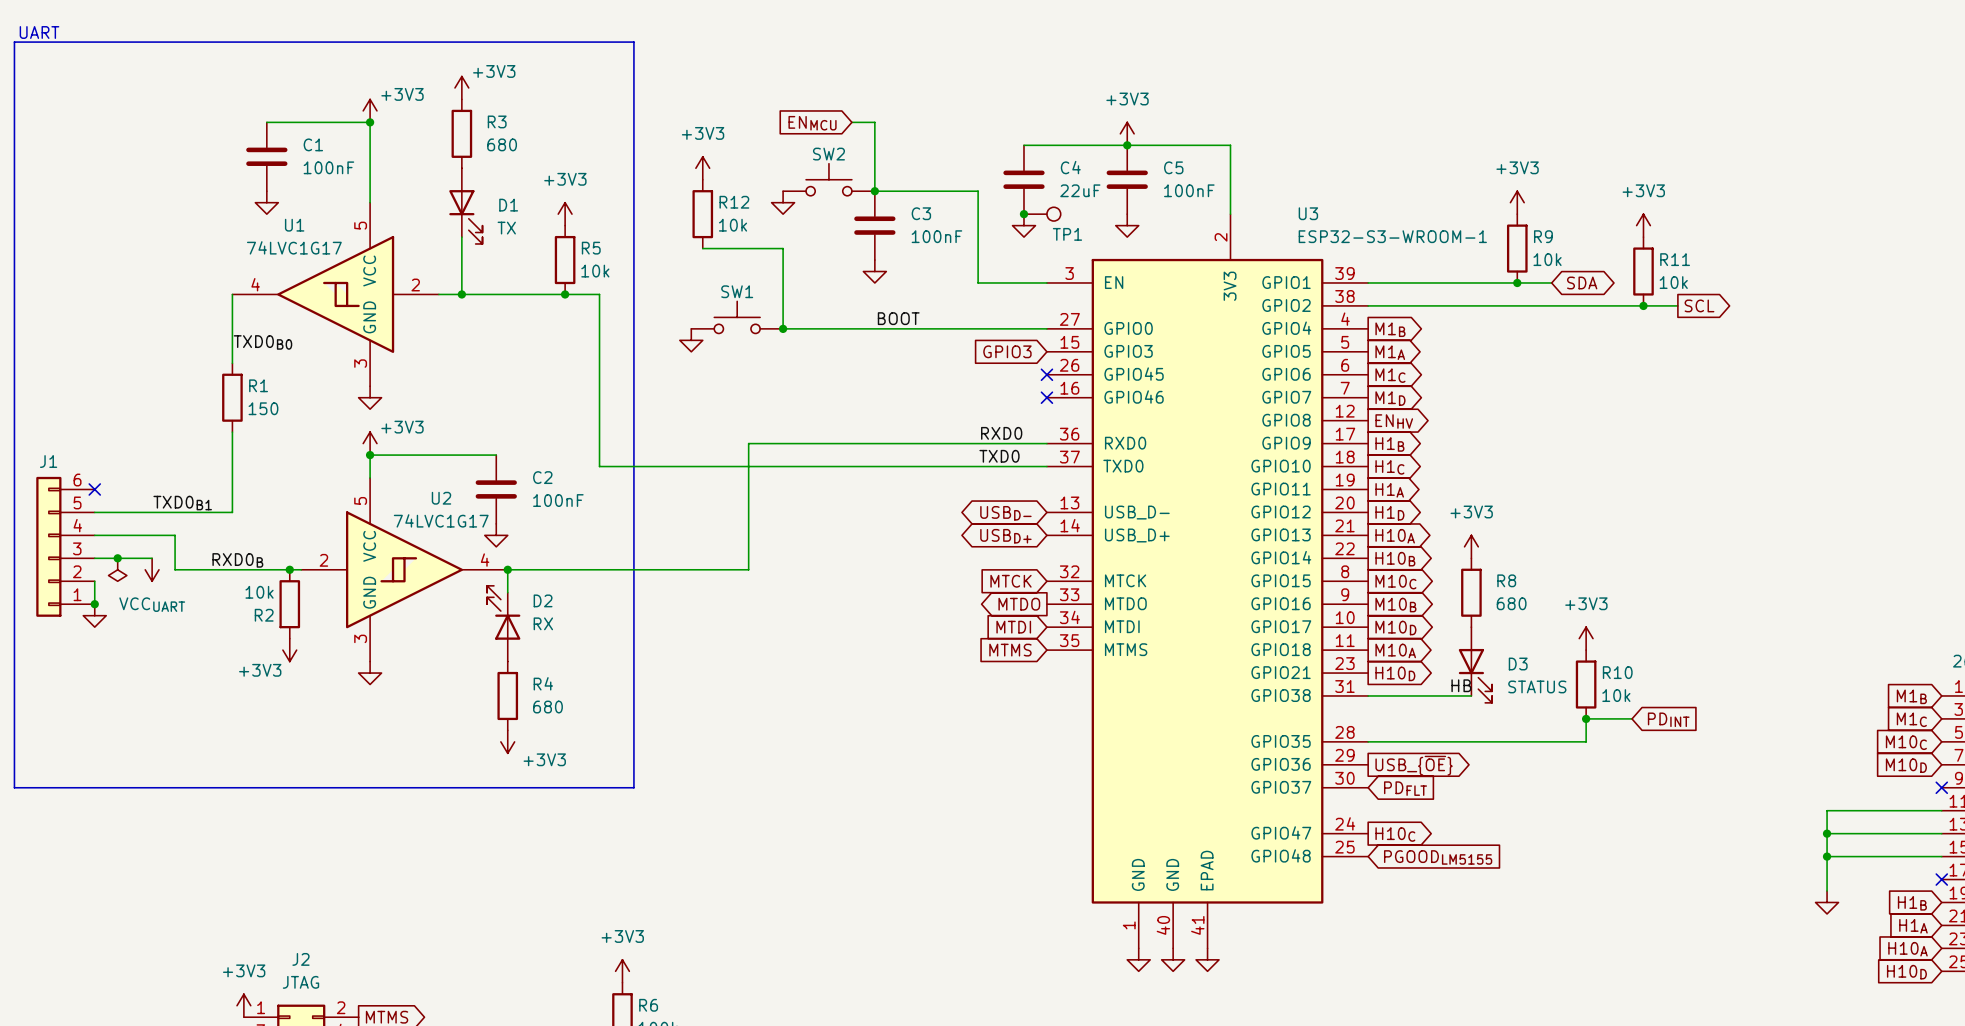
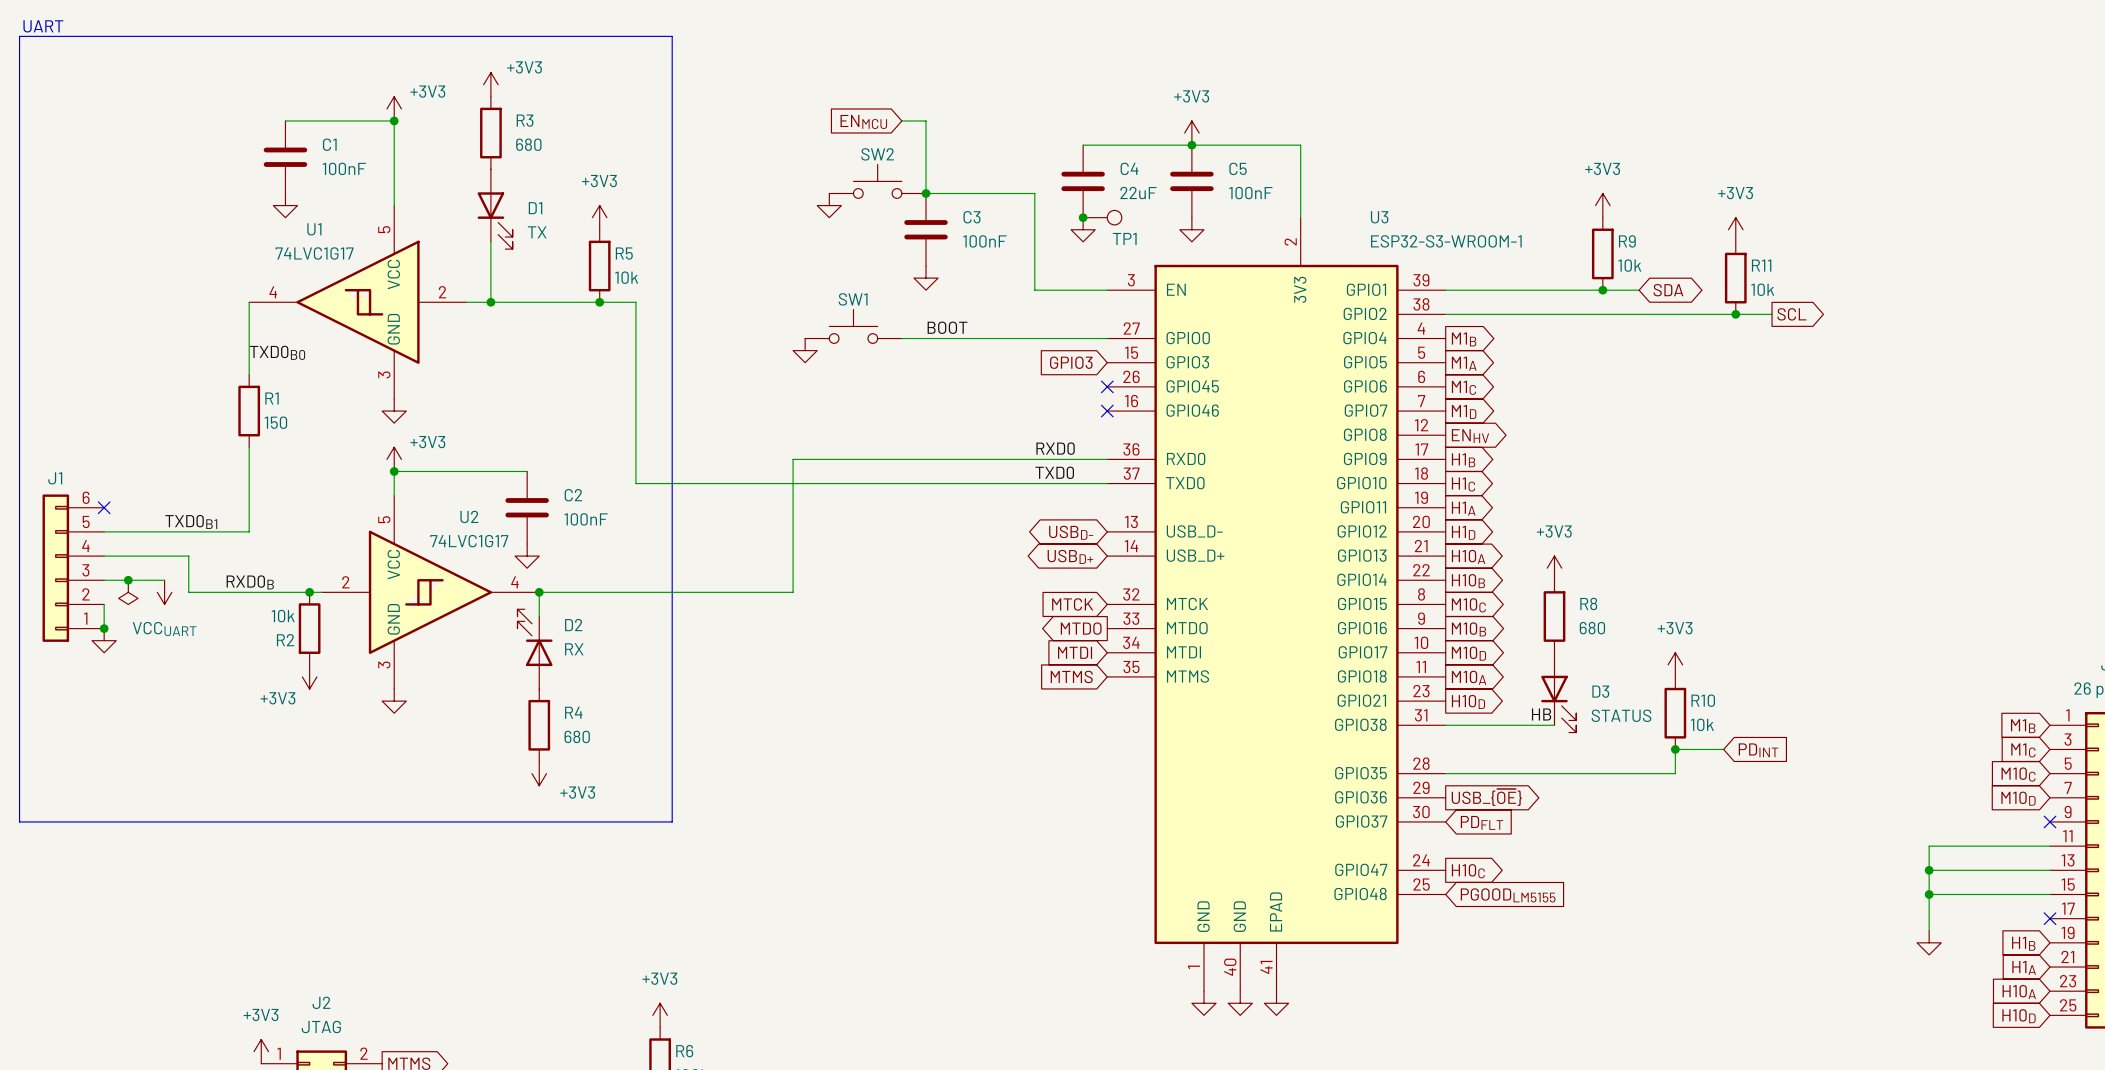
power symbol: +3V3 (702, 168) -> none
R12: 10k (702, 214) -> none
wire: (702, 248) (783, 248) (783, 328) (851, 328) -> none
SW1 position: (737, 317) -> (853, 326)
junction: (783, 328) -> none
power symbol position: (691, 340) -> (805, 350)

